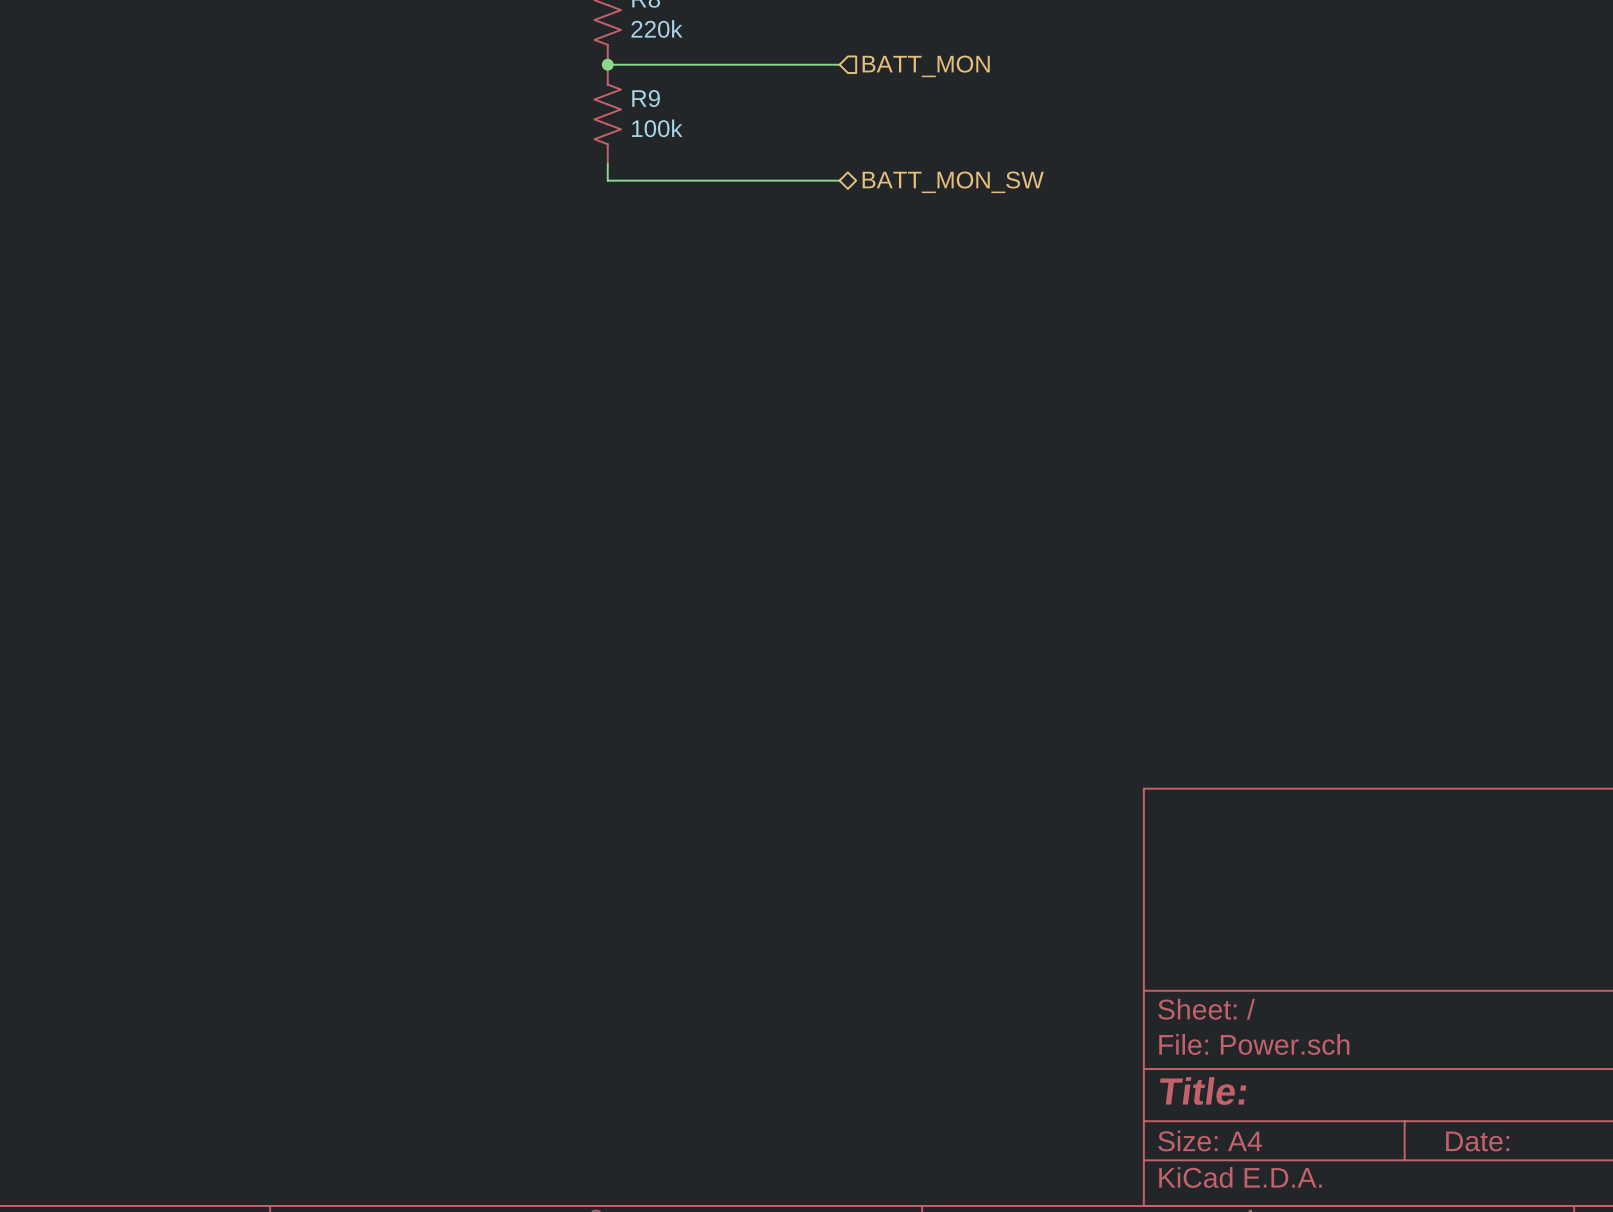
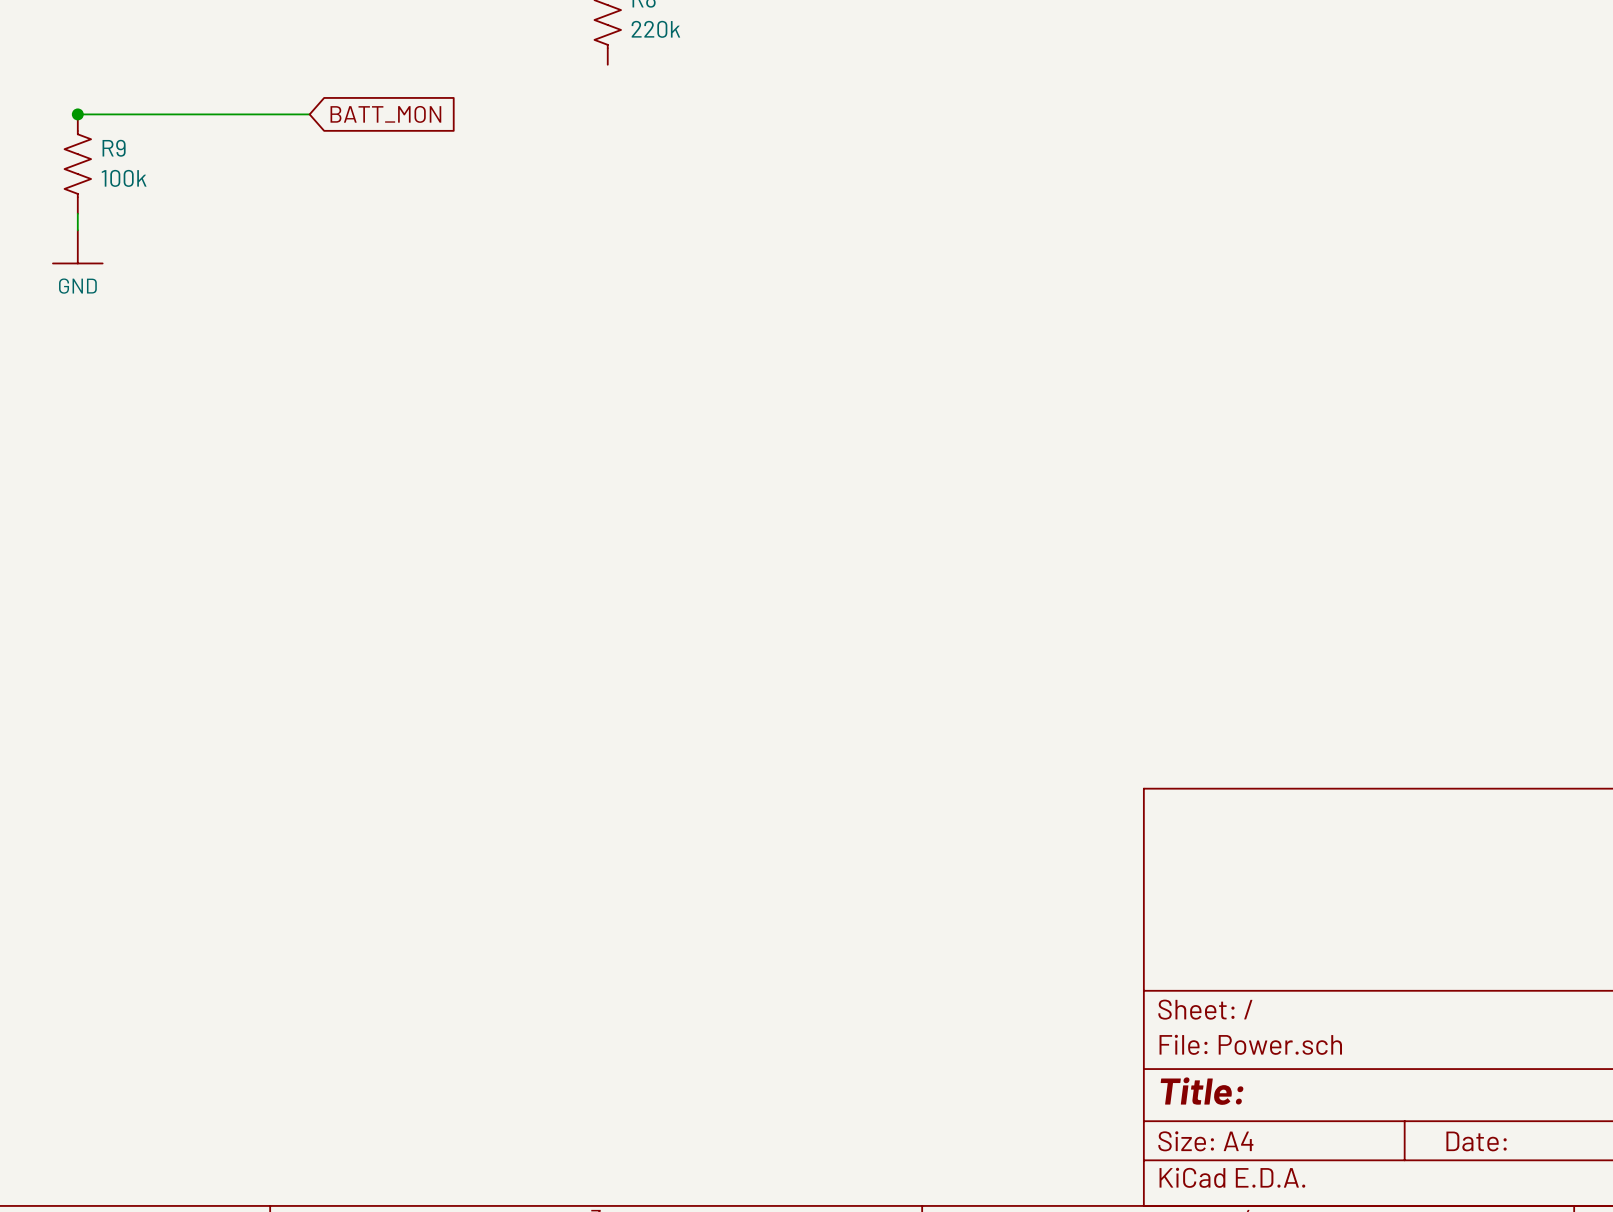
wire: (607, 64) (839, 64) -> none
junction: (607, 64) -> none
hierarchical label: BATT_MON (926, 66) -> none
wire: none -> (77, 114) (309, 114)
junction: none -> (77, 114)
R9 position: (607, 114) -> (77, 164)
global label: none -> BATT_MON (385, 114)
wire: (607, 164) (607, 180) (839, 180) -> none
hierarchical label: BATT_MON_SW (953, 182) -> none
wire: none -> (77, 213) (77, 230)
power symbol: none -> GND (77, 246)

